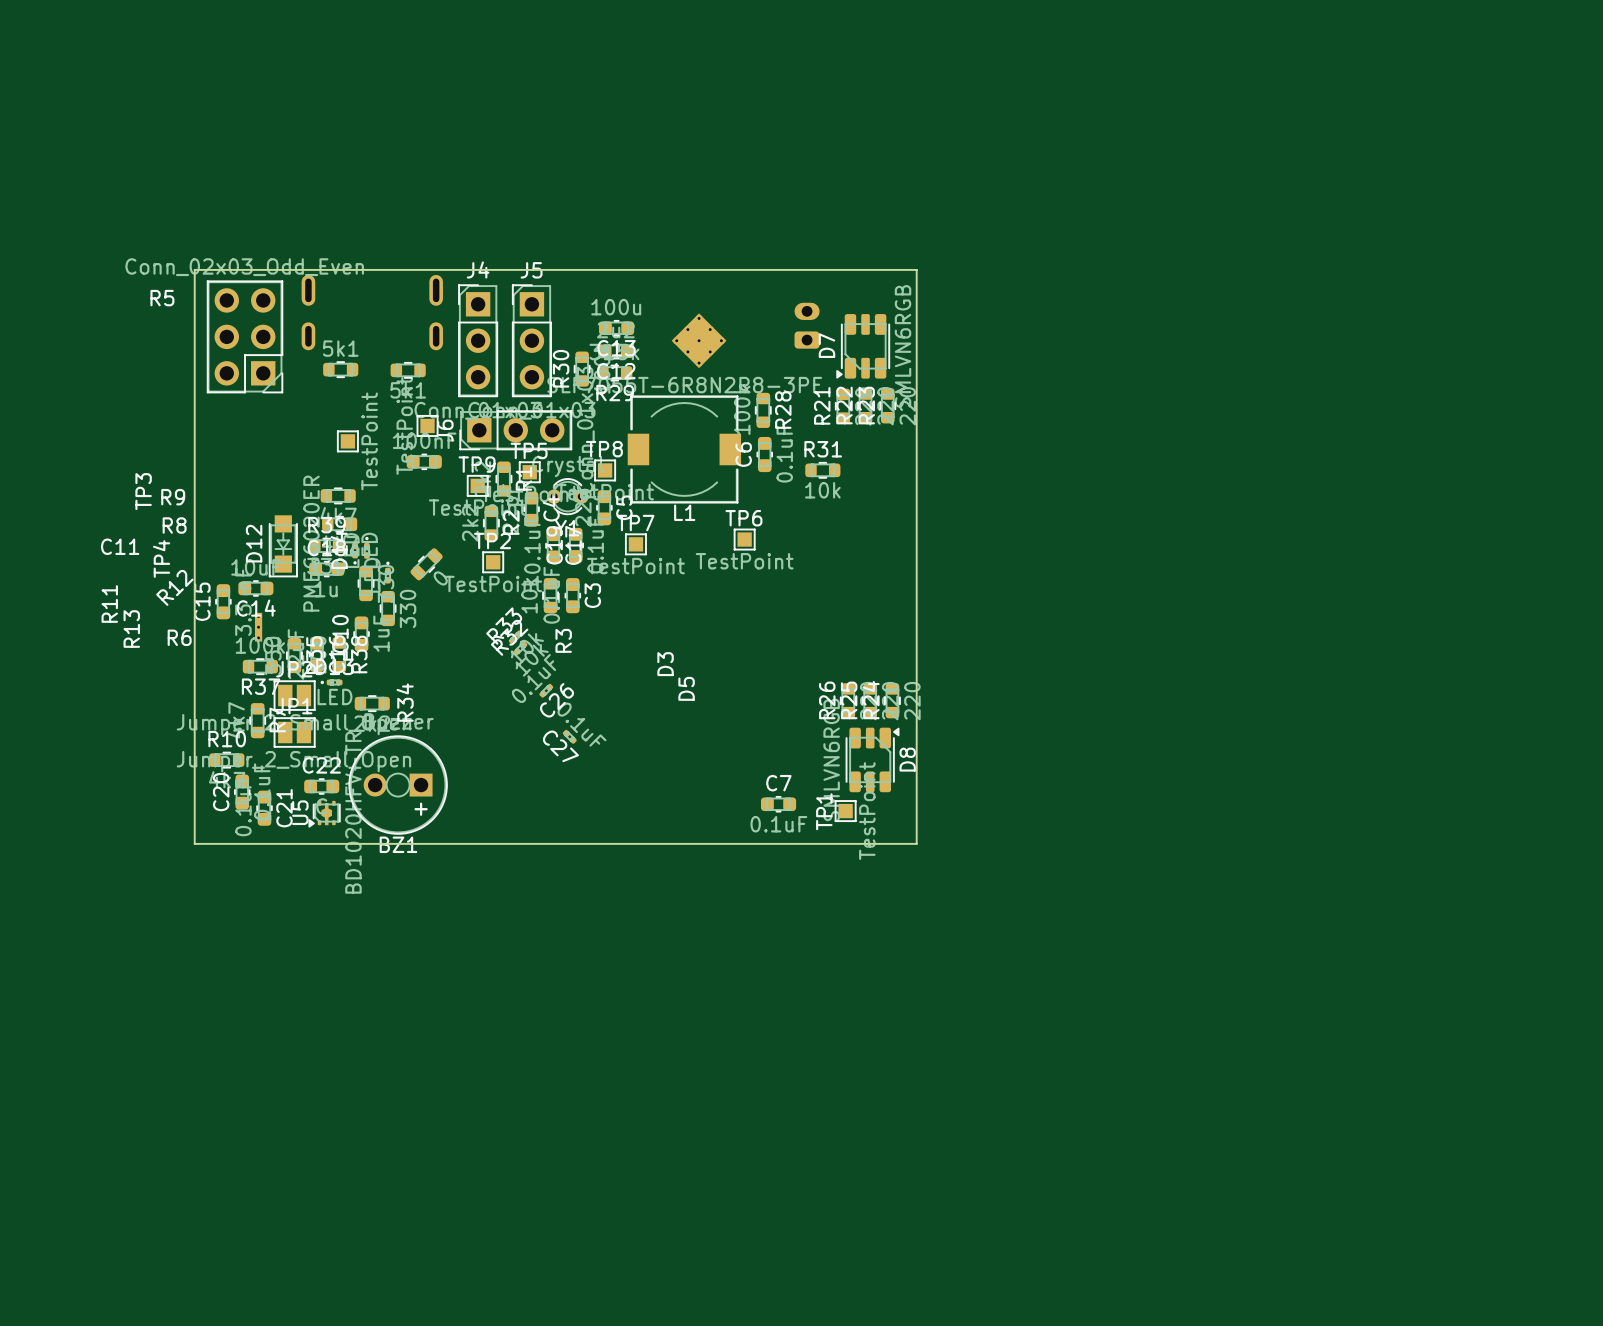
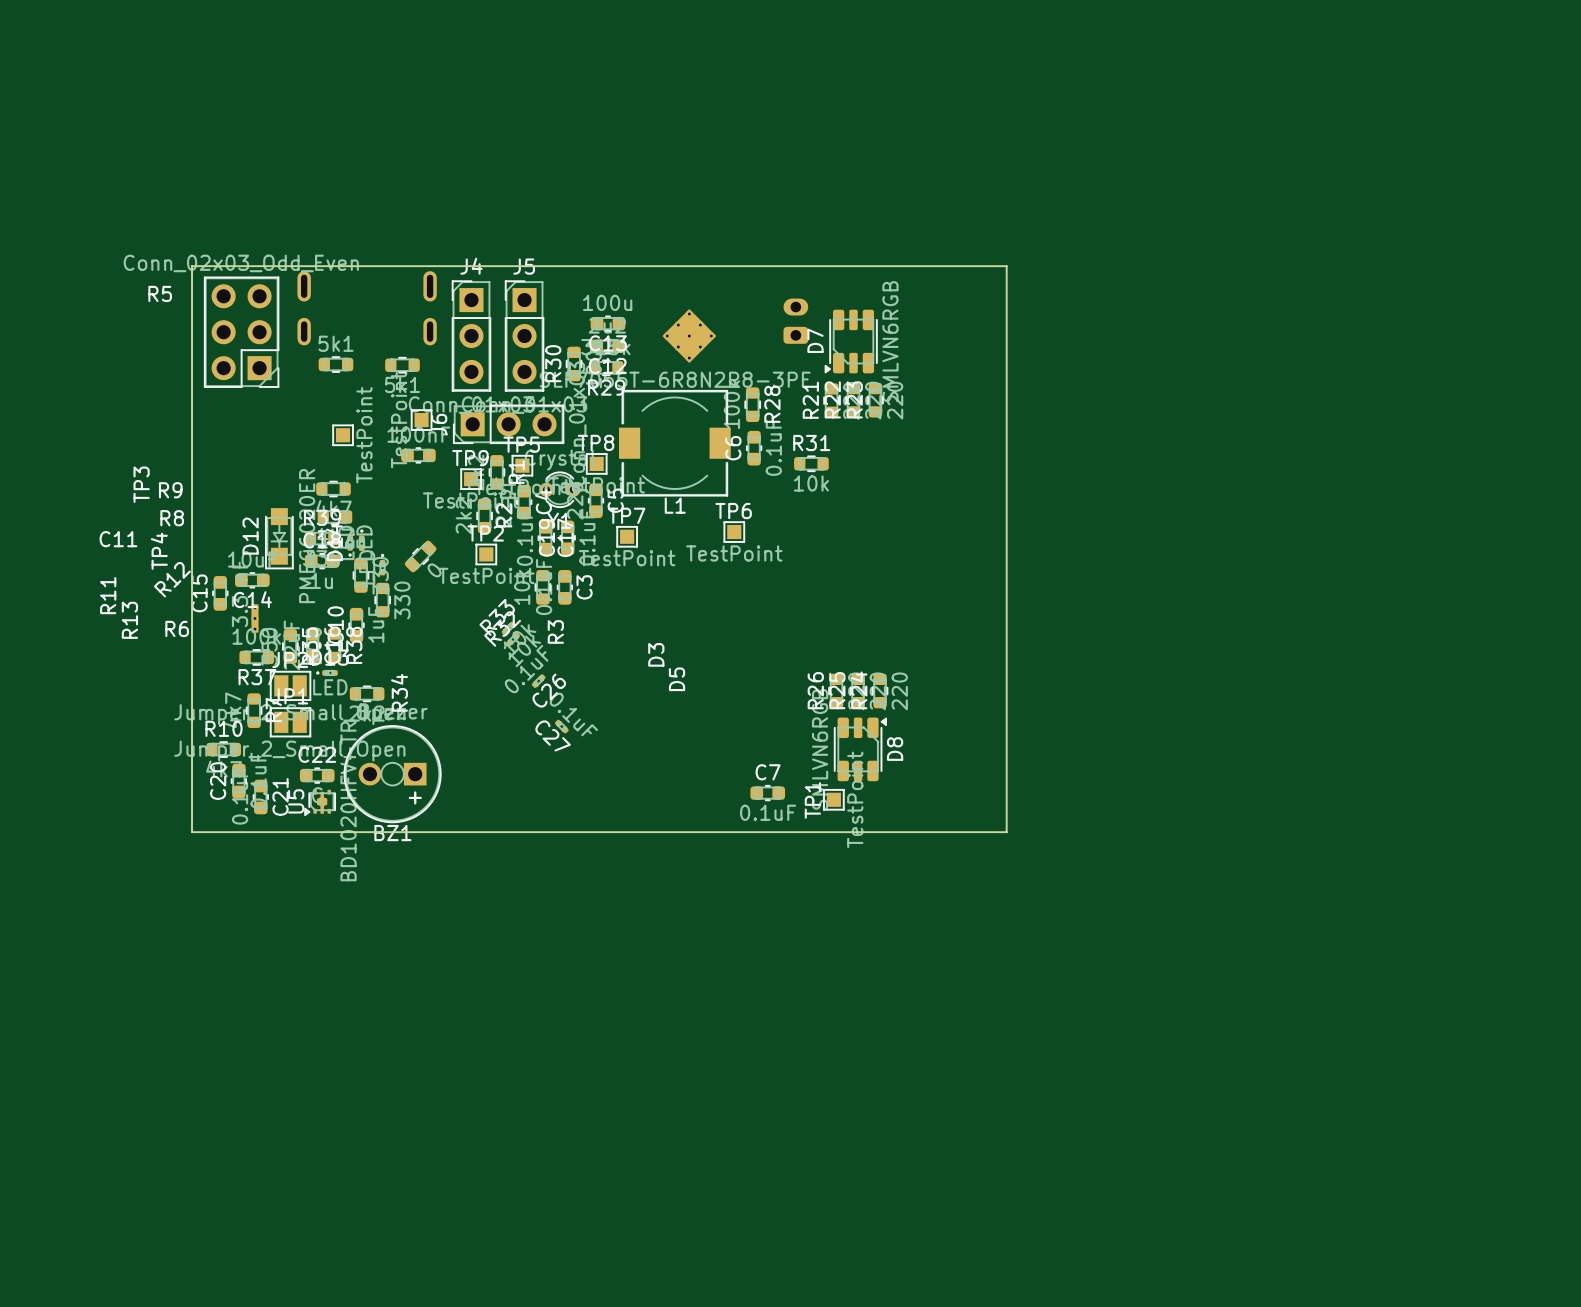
board edge: (916, 269) (916, 843) -> (903, 266) (1006, 266) (1006, 832) (903, 832)

